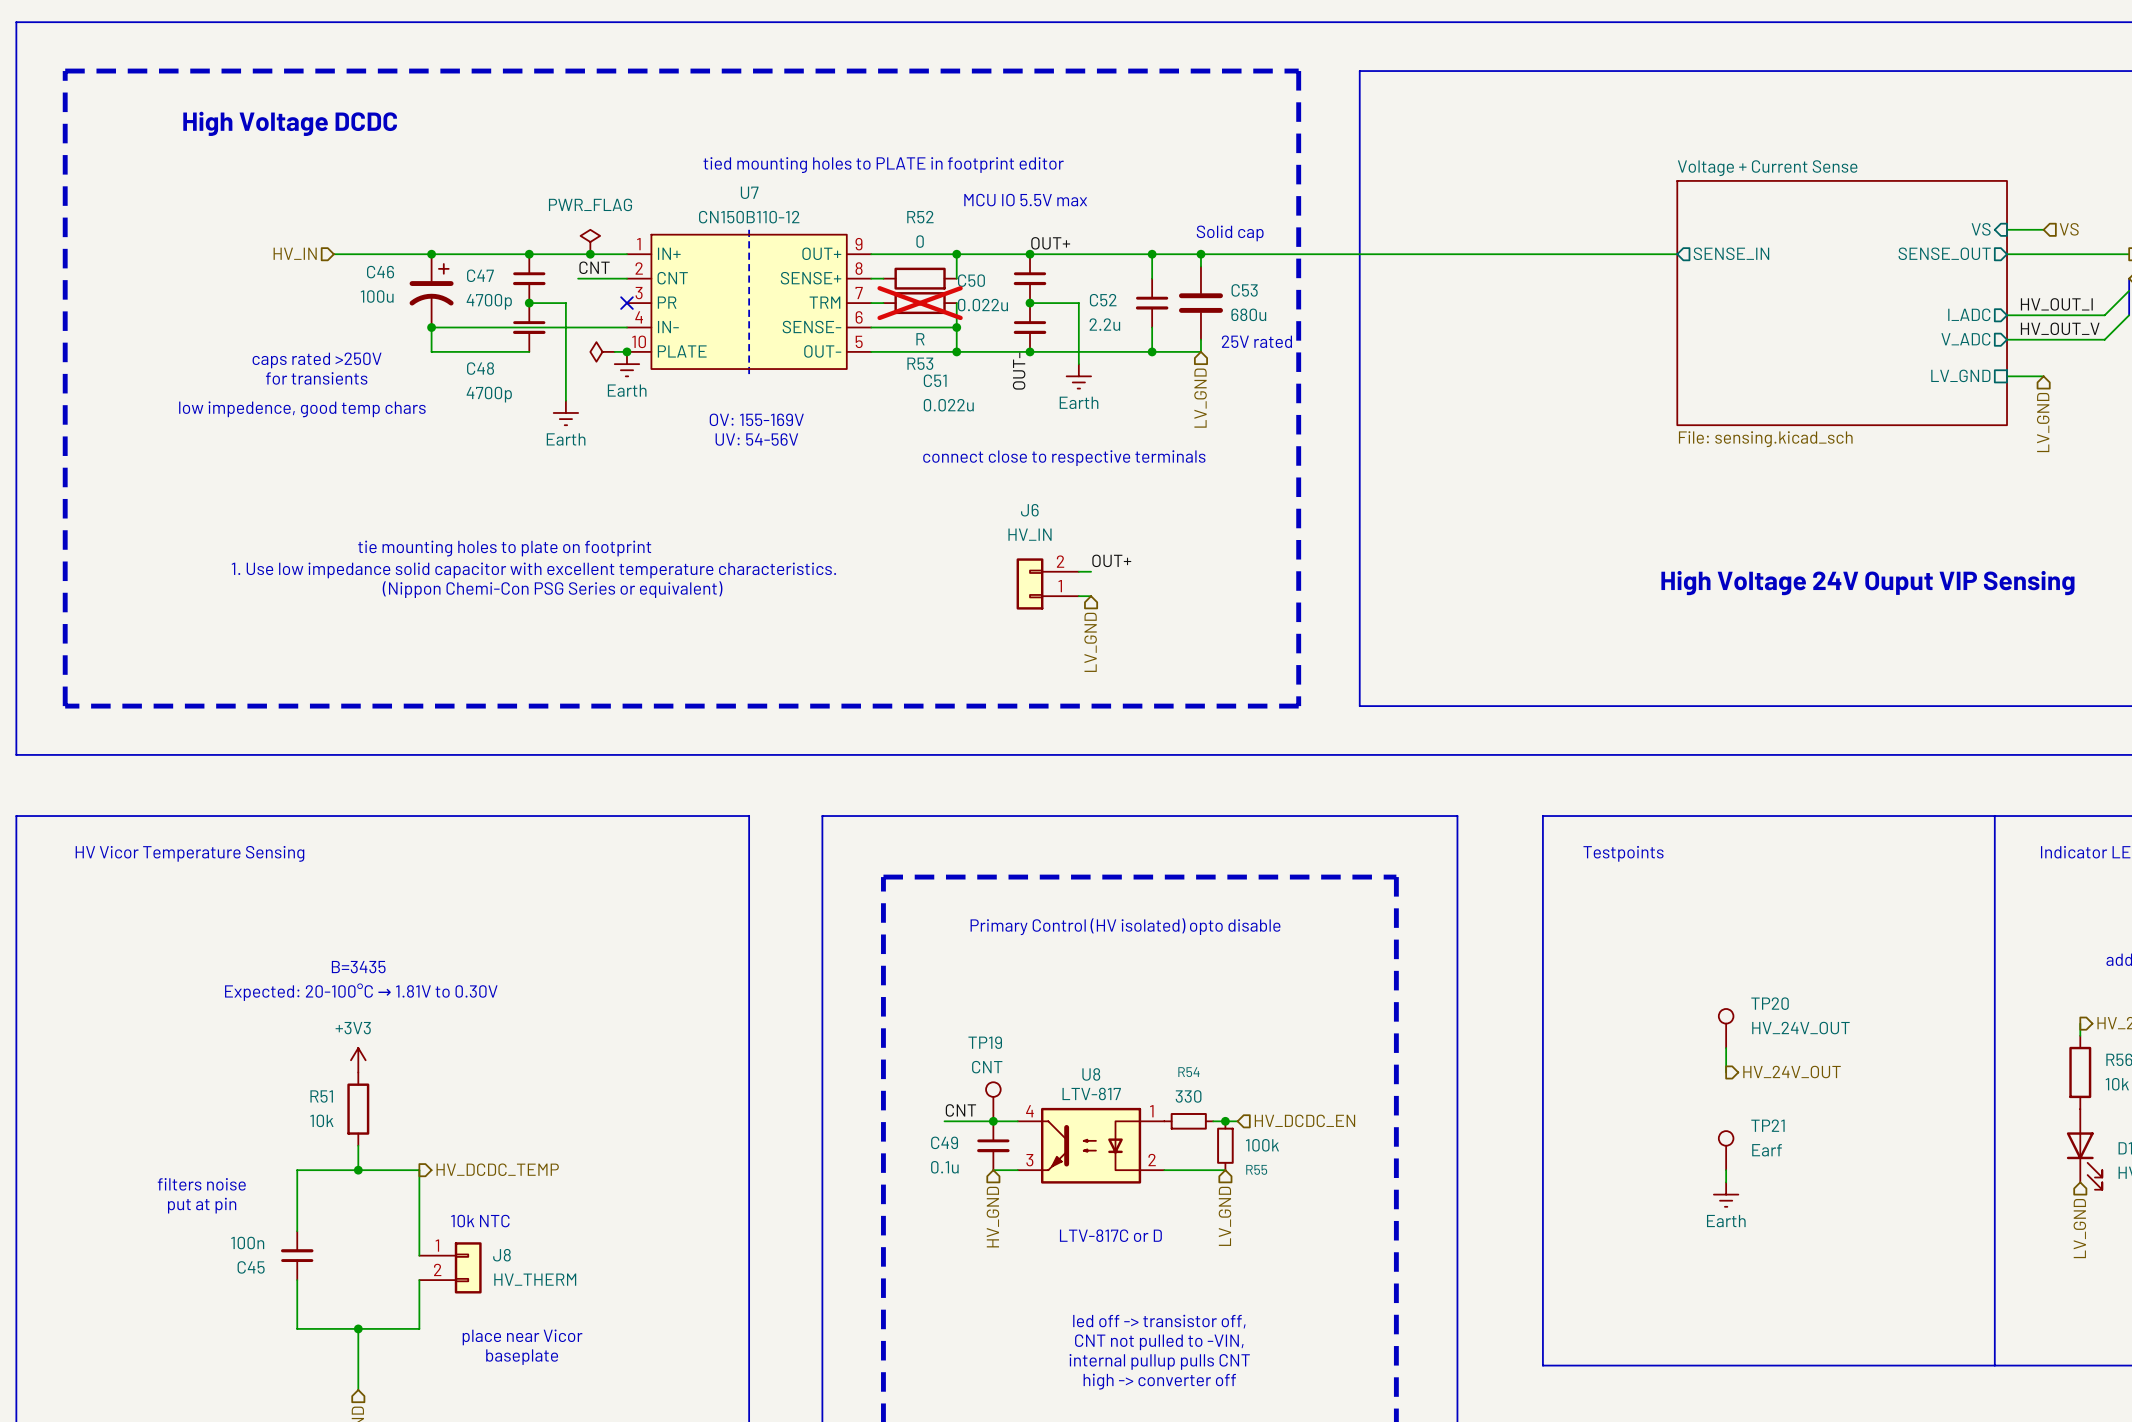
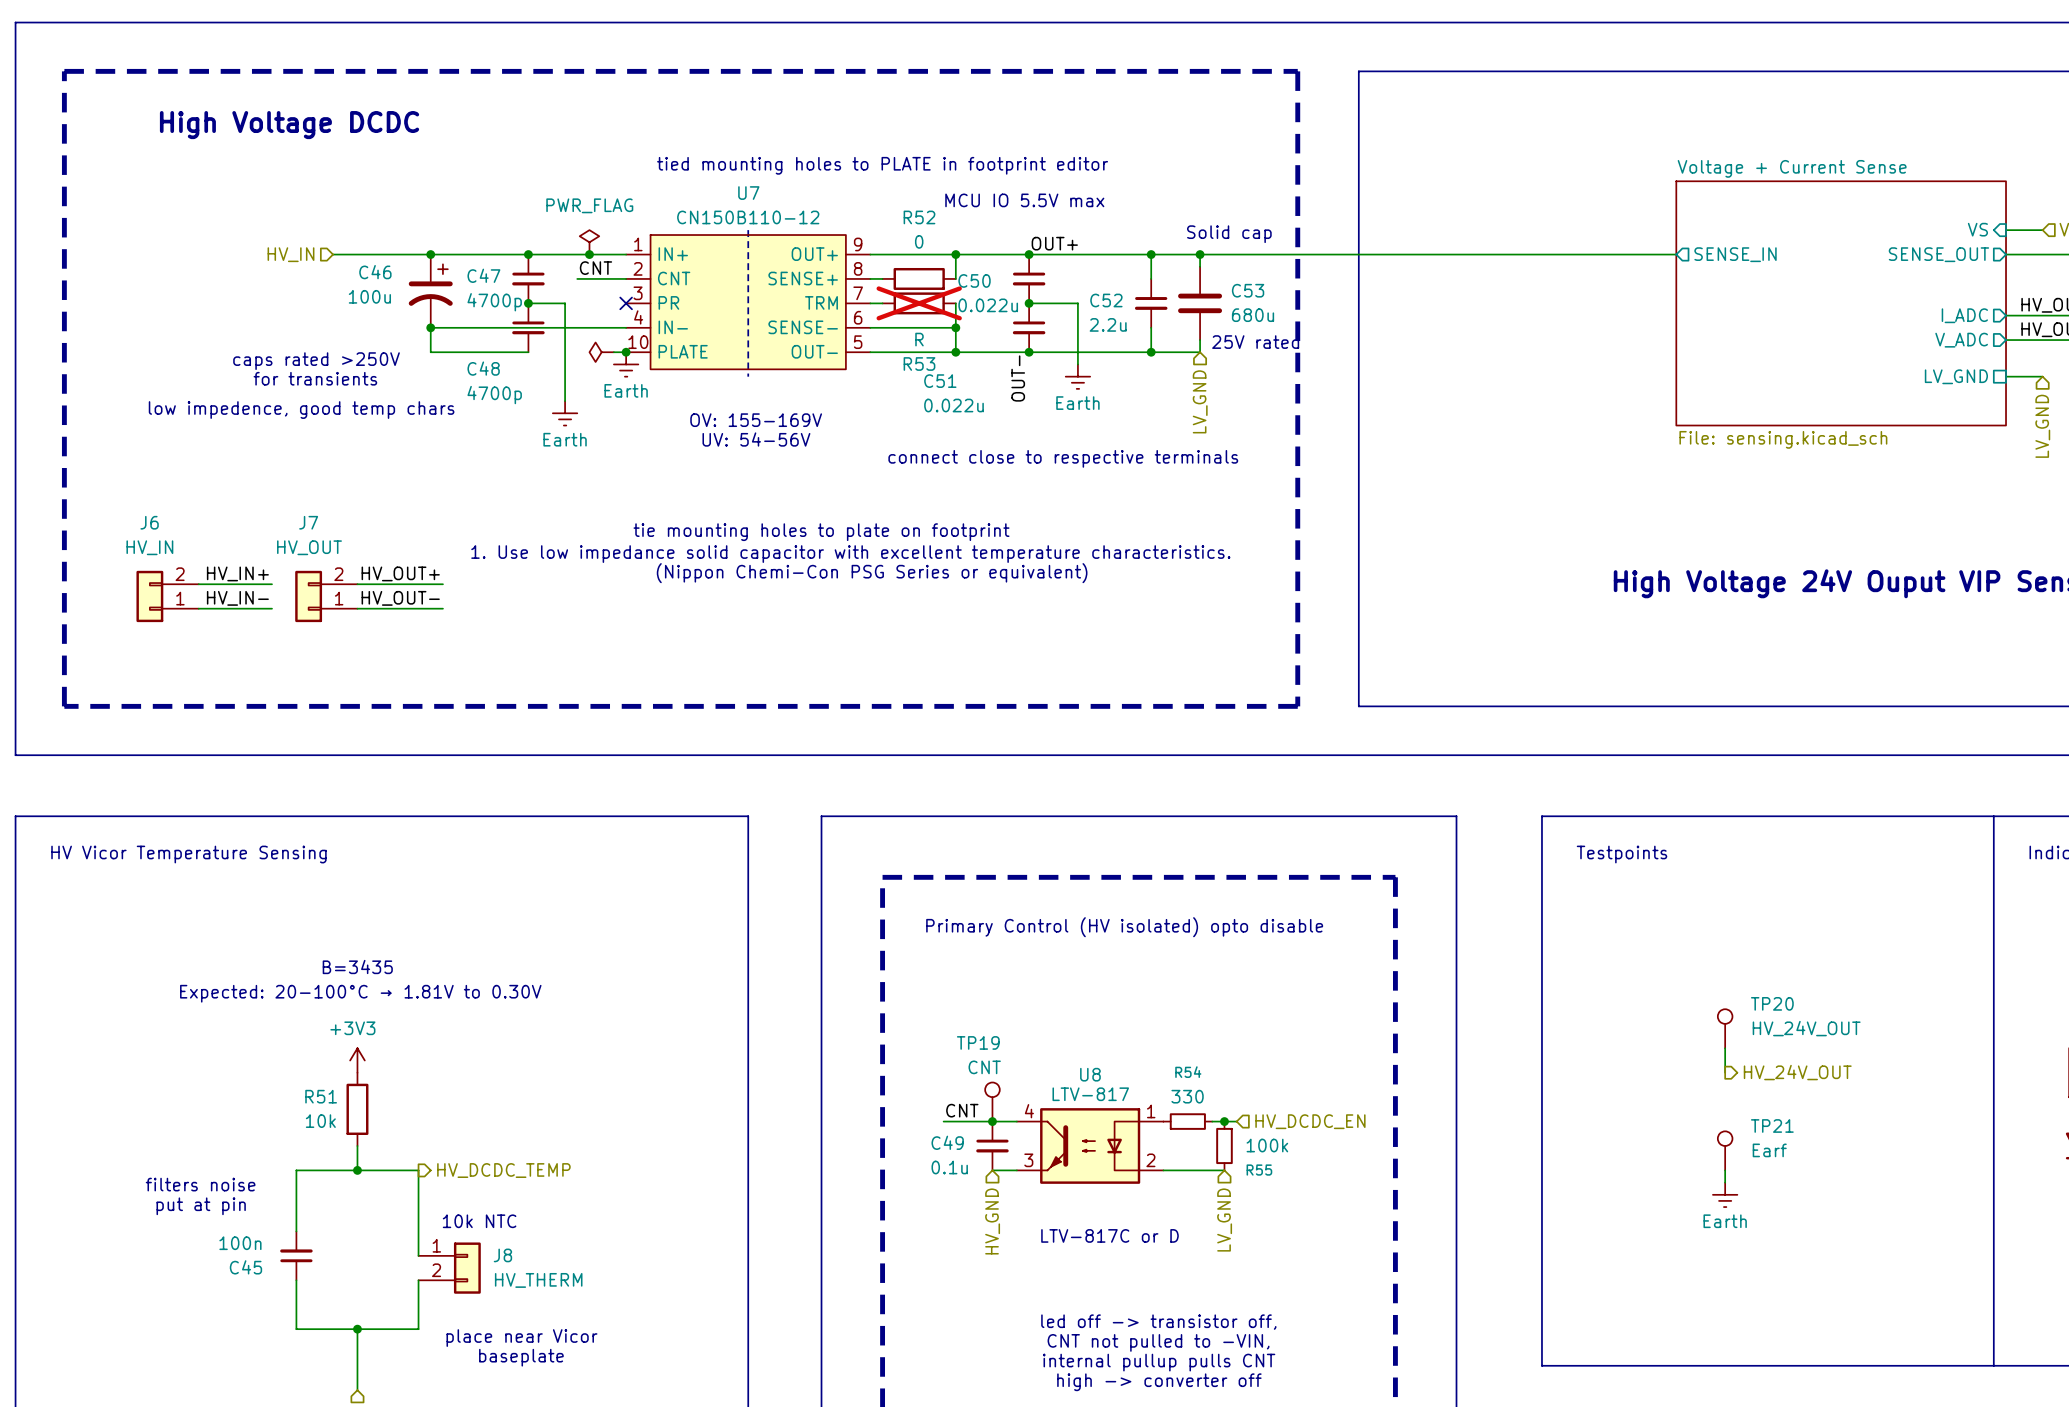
text: none -> tie mounting holes to plate on footprint (821, 532)
text: tie mounting holes to plate on footprint (504, 548) -> none
text: none -> 1. Use low impedance solid capacitor with excellent temperature characteristics. (850, 554)
label: OUT+ (1111, 560) -> none
text: 1. Use low impedance solid capacitor with excellent temperature characteristics. (533, 570) -> none
wire: (1078, 571) (1091, 571) -> none
text: none -> (Nippon Chemi-Con PSG Series or equivalent) (872, 573)
label: none -> HV_IN+ (237, 573)
label: none -> HV_OUT+ (400, 573)
wire: none -> (198, 584) (271, 584)
wire: none -> (357, 584) (442, 584)
J6 position: (1047, 583) -> (167, 596)
text: (Nippon Chemi-Con PSG Series or equivalent) (552, 589) -> none
J7: none -> HV_OUT (326, 596)
wire: (1078, 596) (1091, 596) -> none
label: none -> HV_IN- (237, 598)
label: none -> HV_OUT- (400, 598)
wire: none -> (198, 608) (271, 608)
wire: none -> (357, 608) (442, 608)
hierarchical label: LV_GND (1090, 642) -> none

